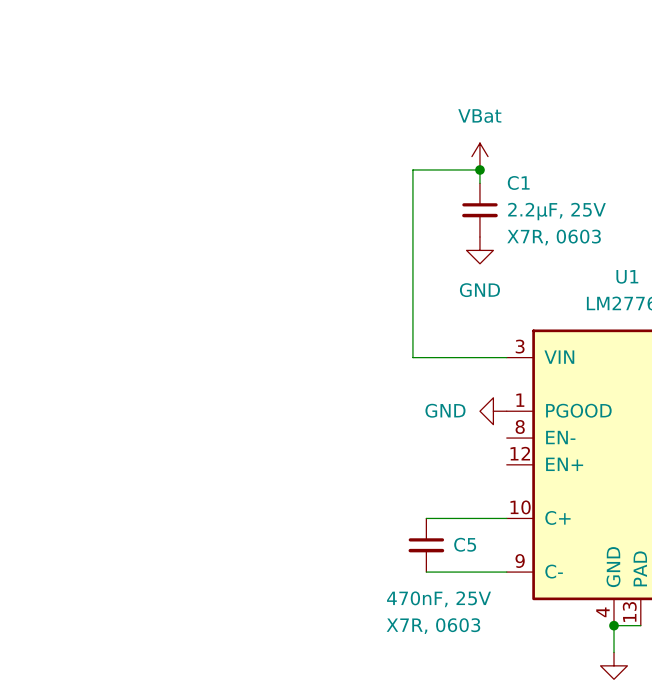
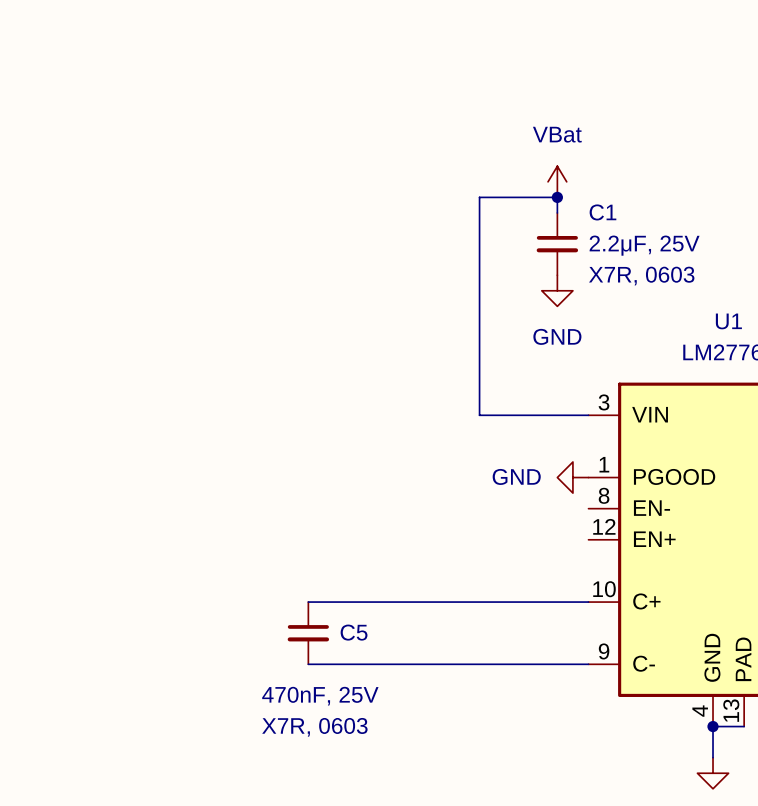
wire: none -> (308, 602) (495, 602)
C5 position: (426, 545) -> (308, 633)
wire: none -> (308, 664) (495, 664)

